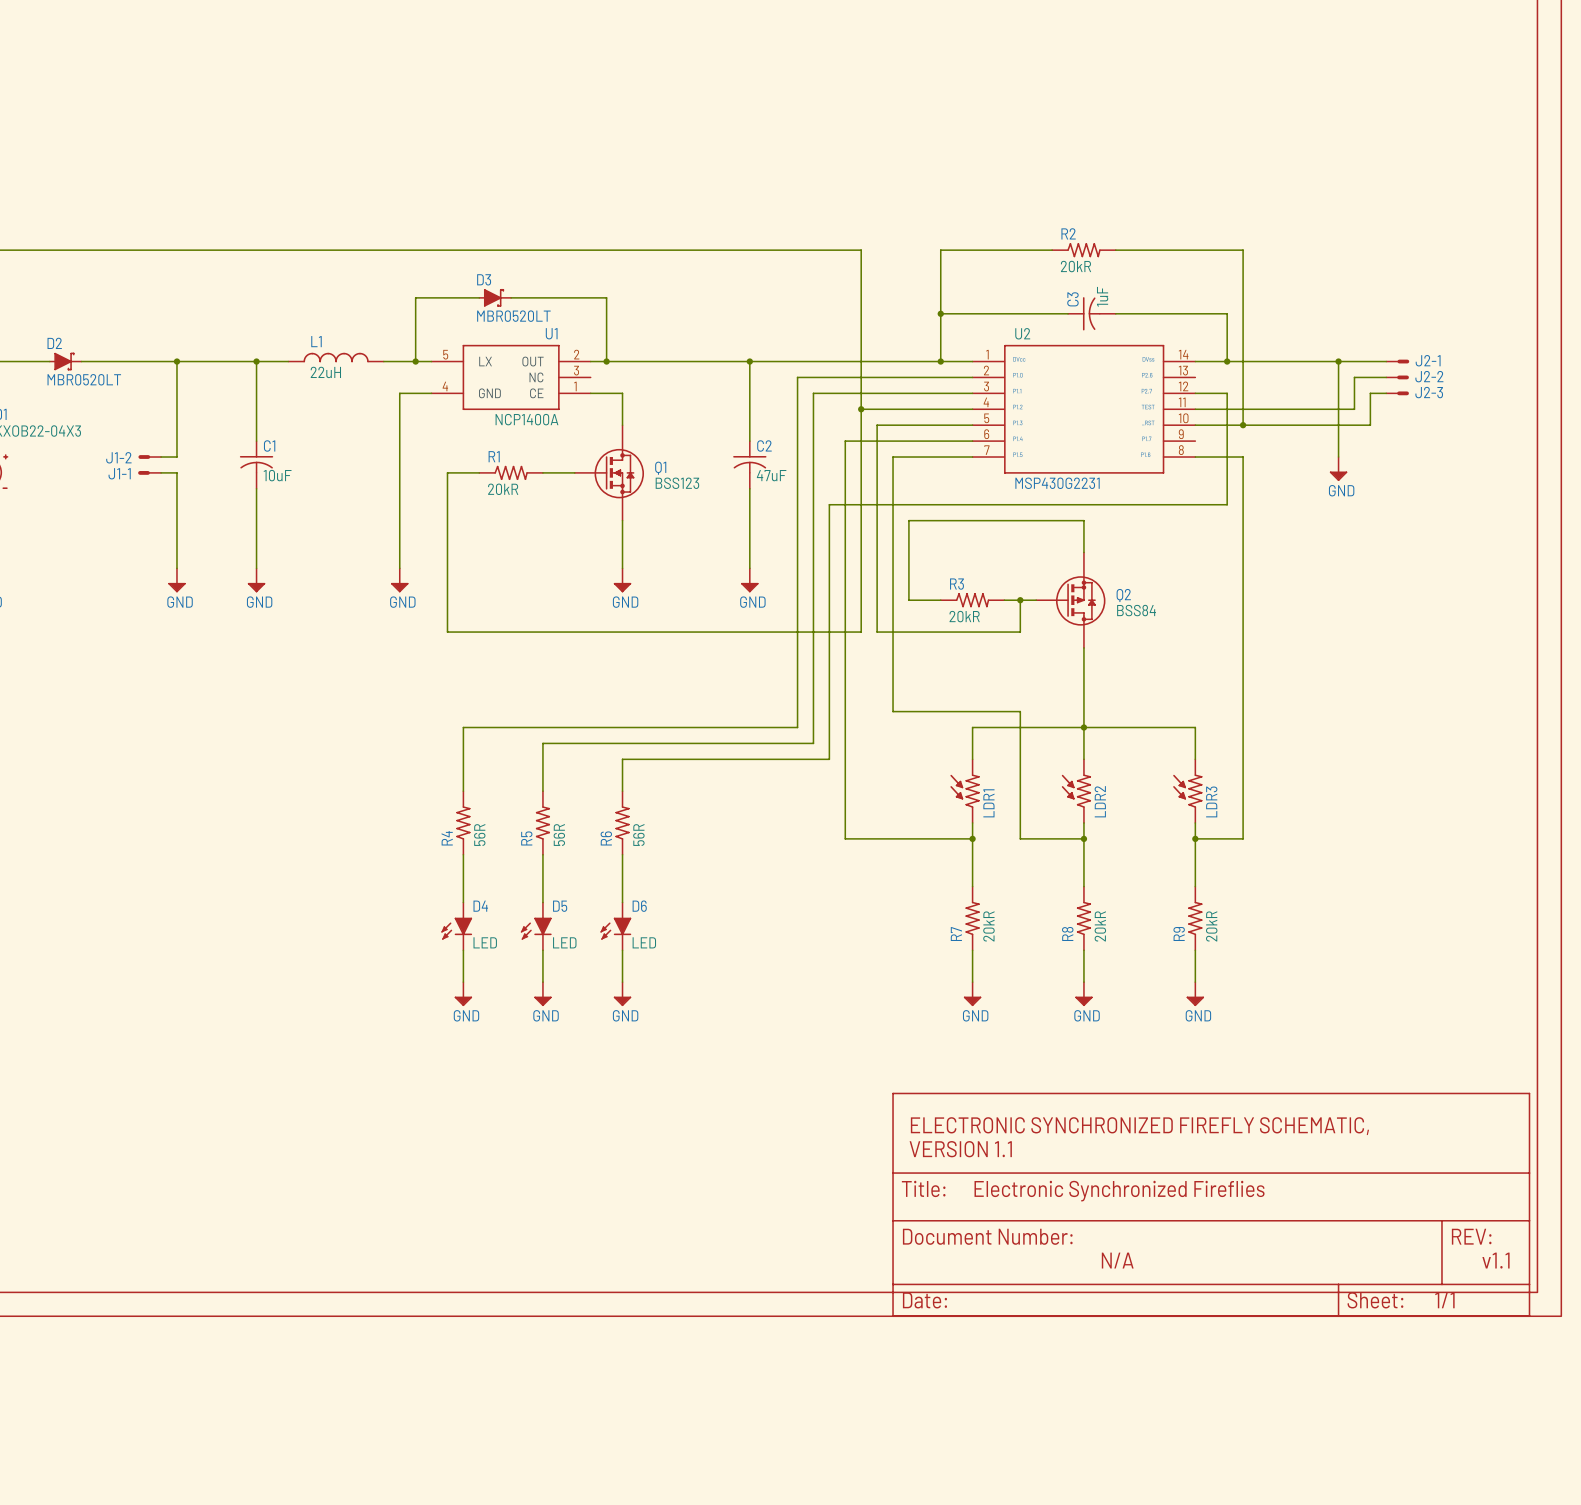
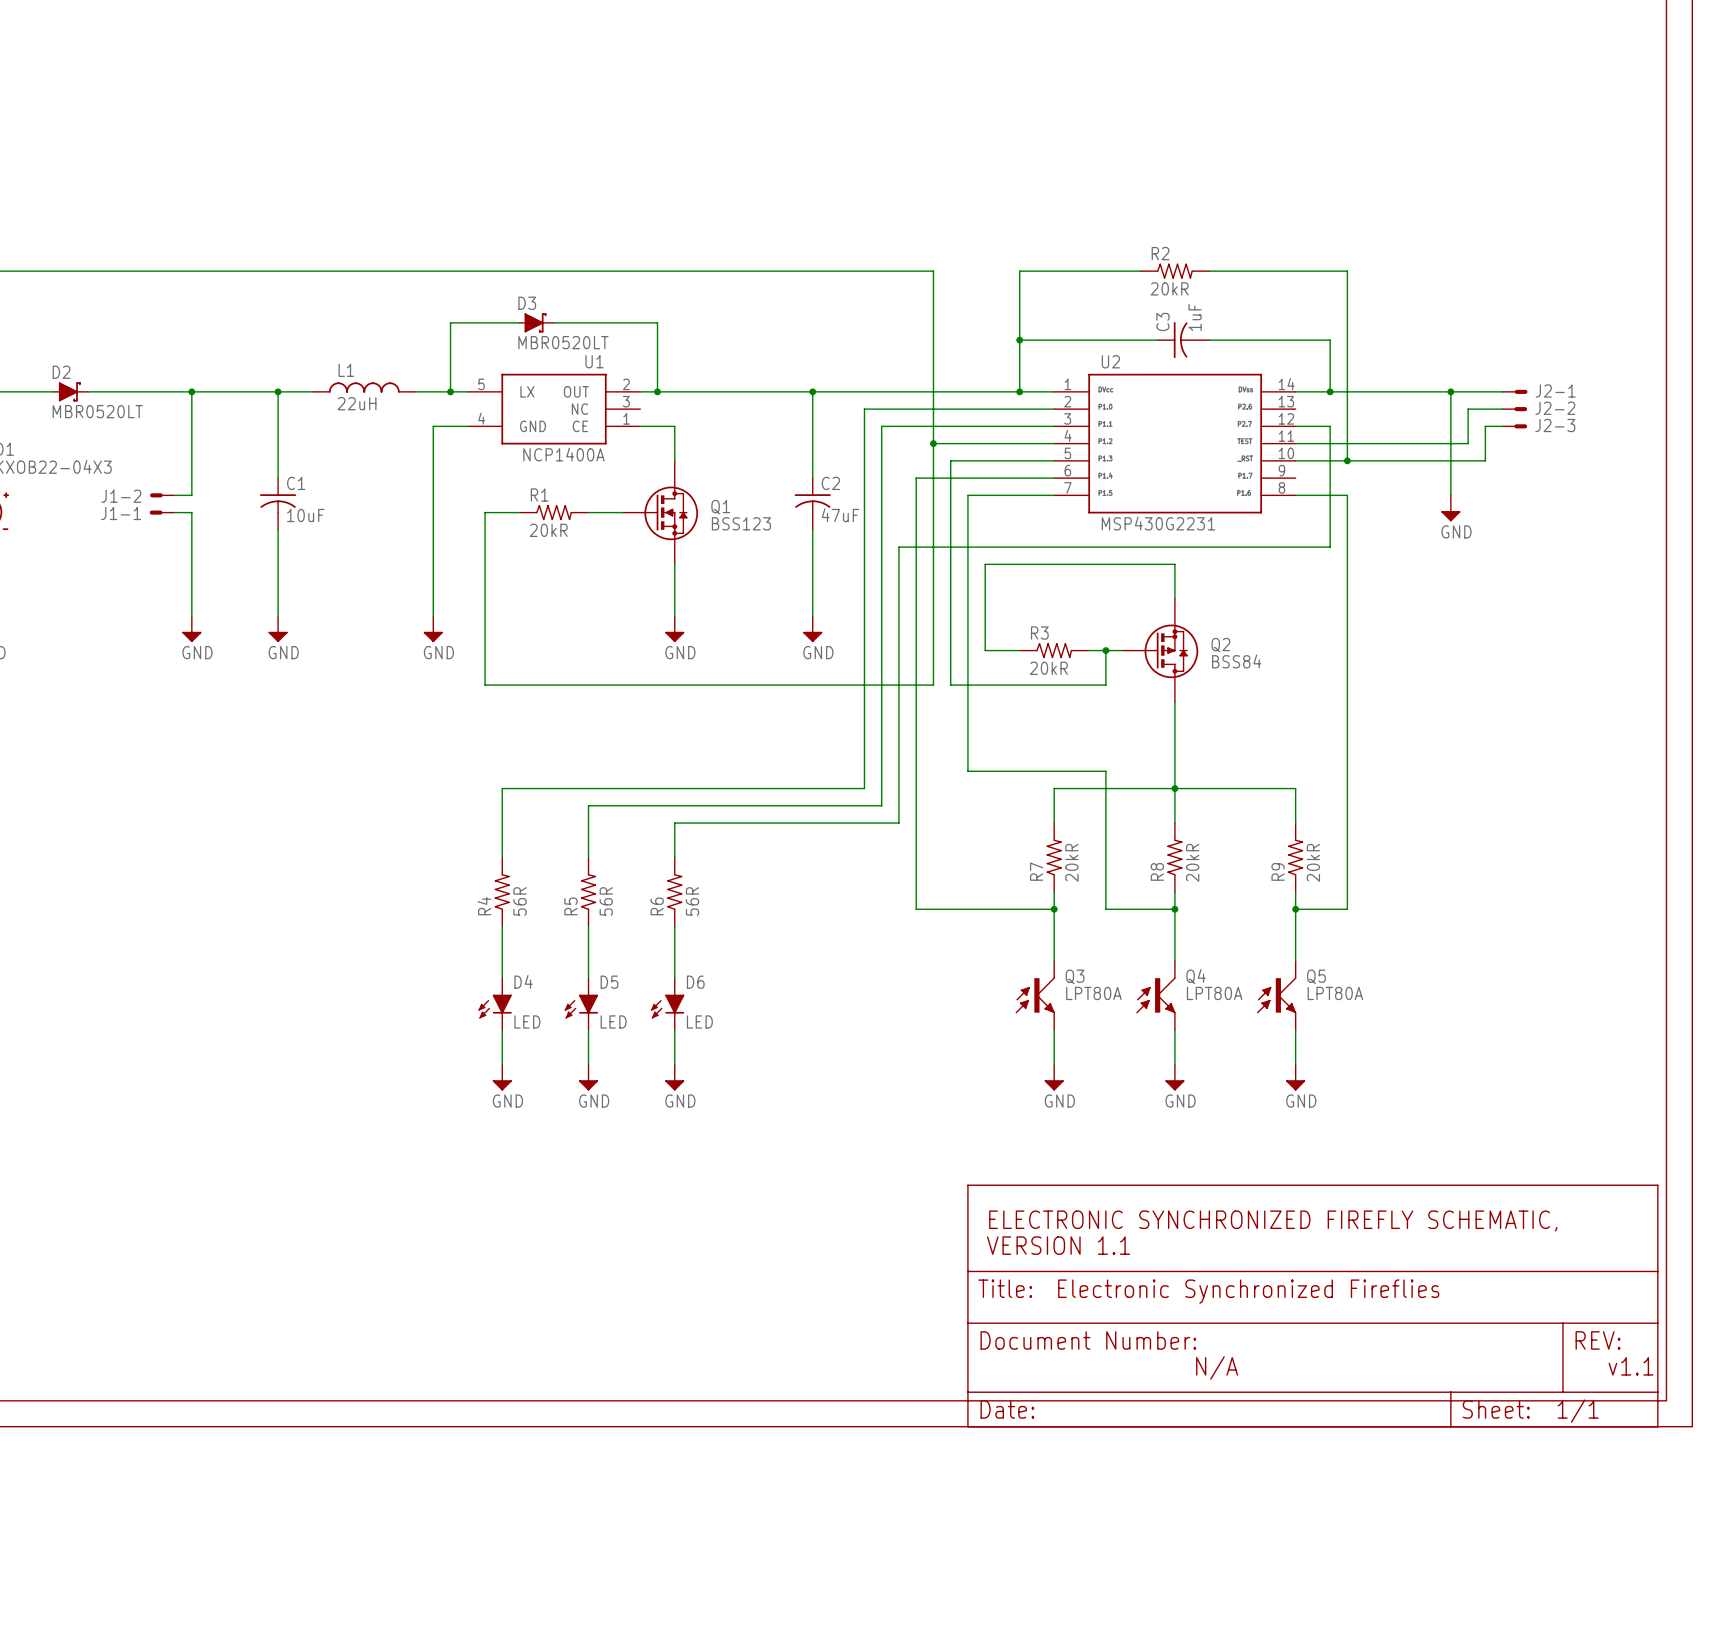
LDR1: (964, 791) -> none
LDR2: (1076, 791) -> none
LDR3: (1187, 791) -> none
Q3: none -> LPT80A (1035, 995)
R7 position: (972, 918) -> (1054, 857)
Q4: none -> LPT80A (1155, 995)
R8 position: (1083, 918) -> (1174, 857)
Q5: none -> LPT80A (1276, 995)
R9 position: (1195, 918) -> (1295, 857)

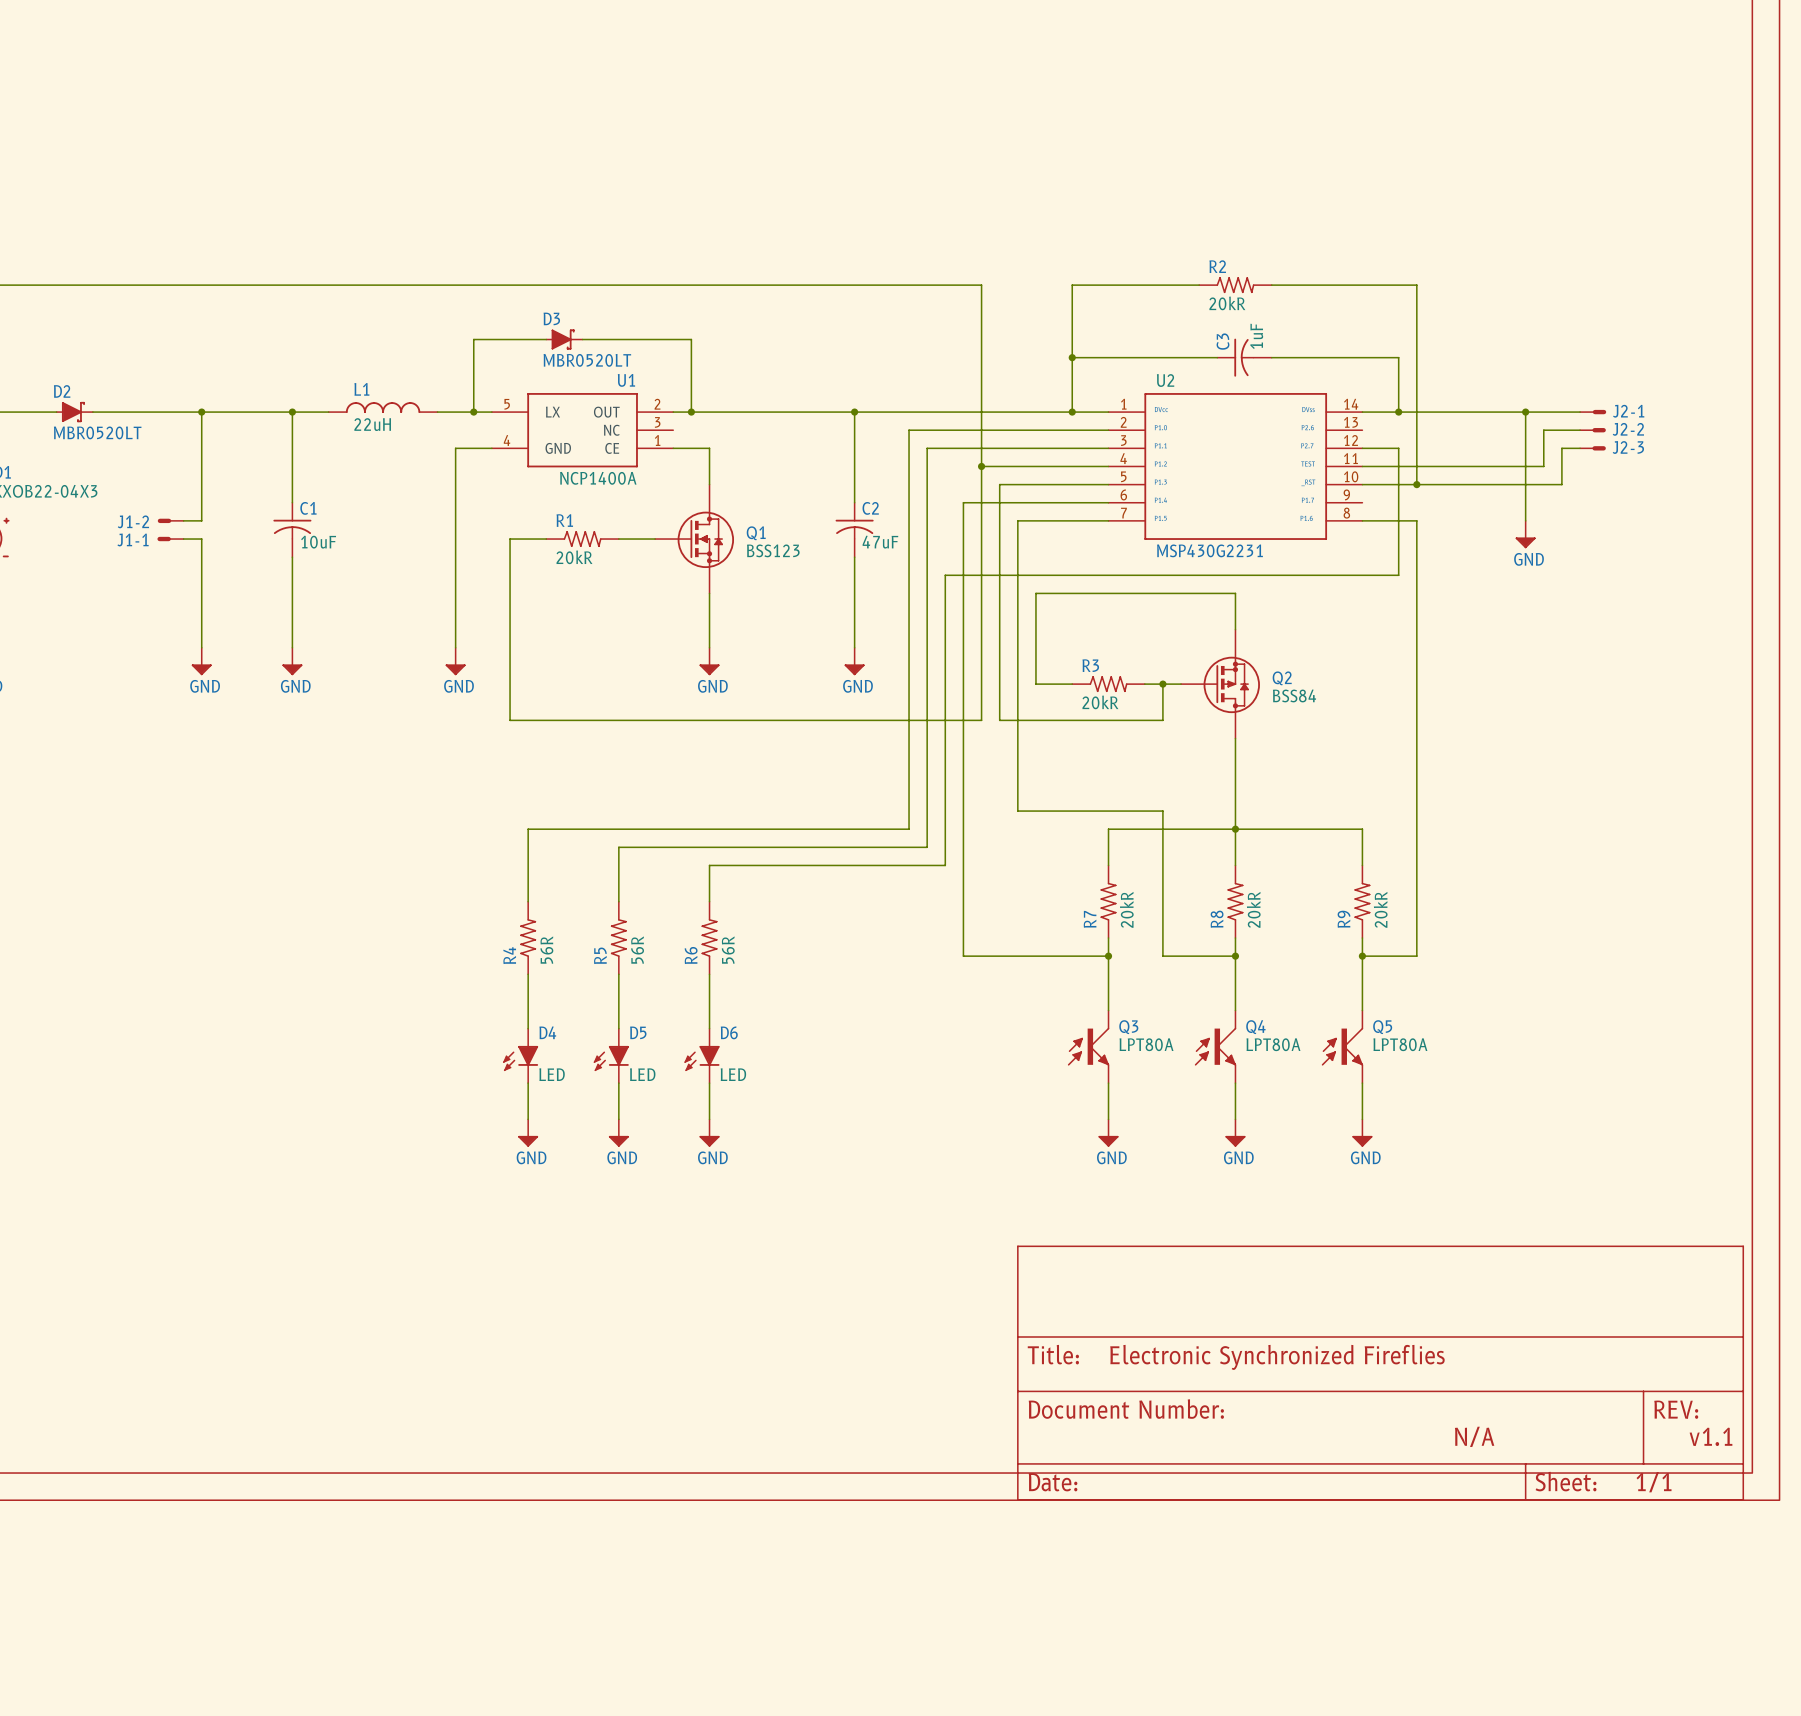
text: ELECTRONIC SYNCHRONIZED FIREFLY SCHEMATIC, (1273, 1220) -> none
text: VERSION 1.1 (1058, 1245) -> none
text: N/A (1217, 1367) -> none
text: none -> N/A (1474, 1436)

